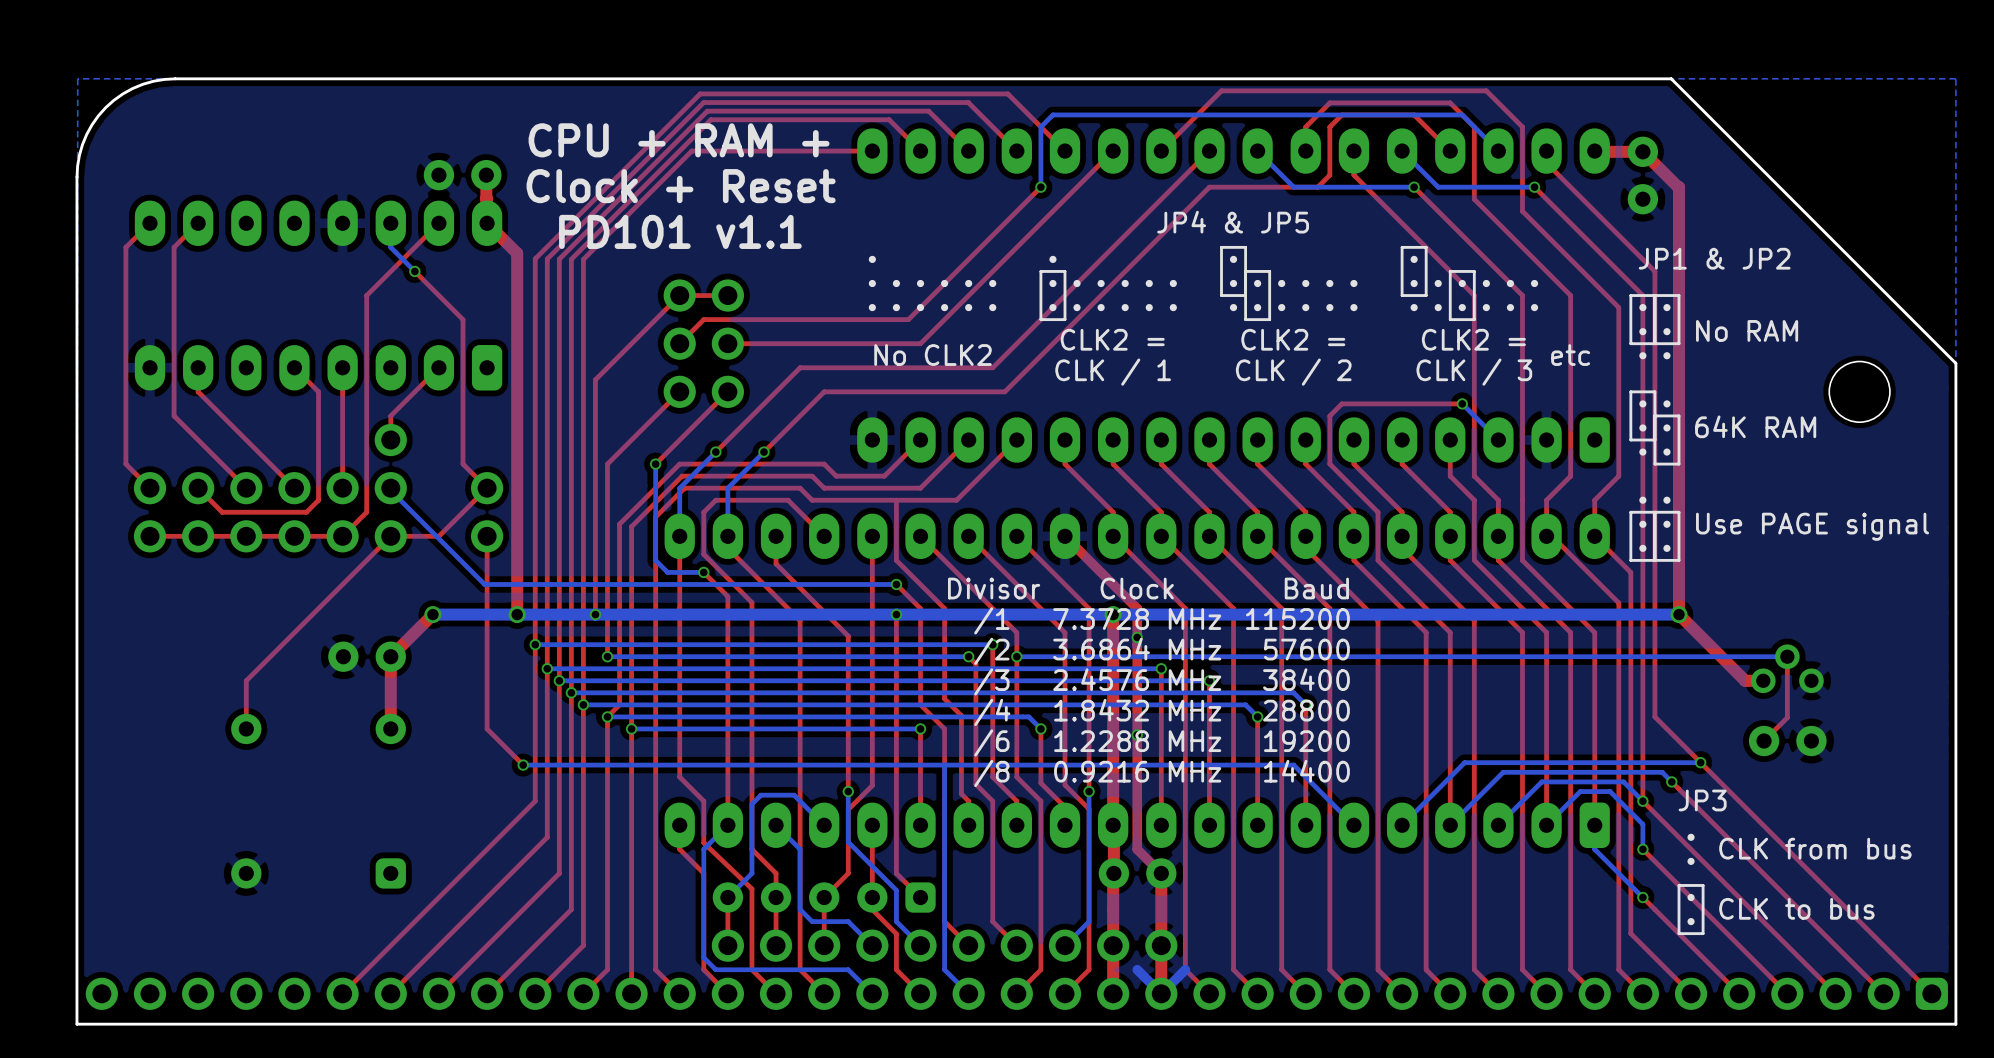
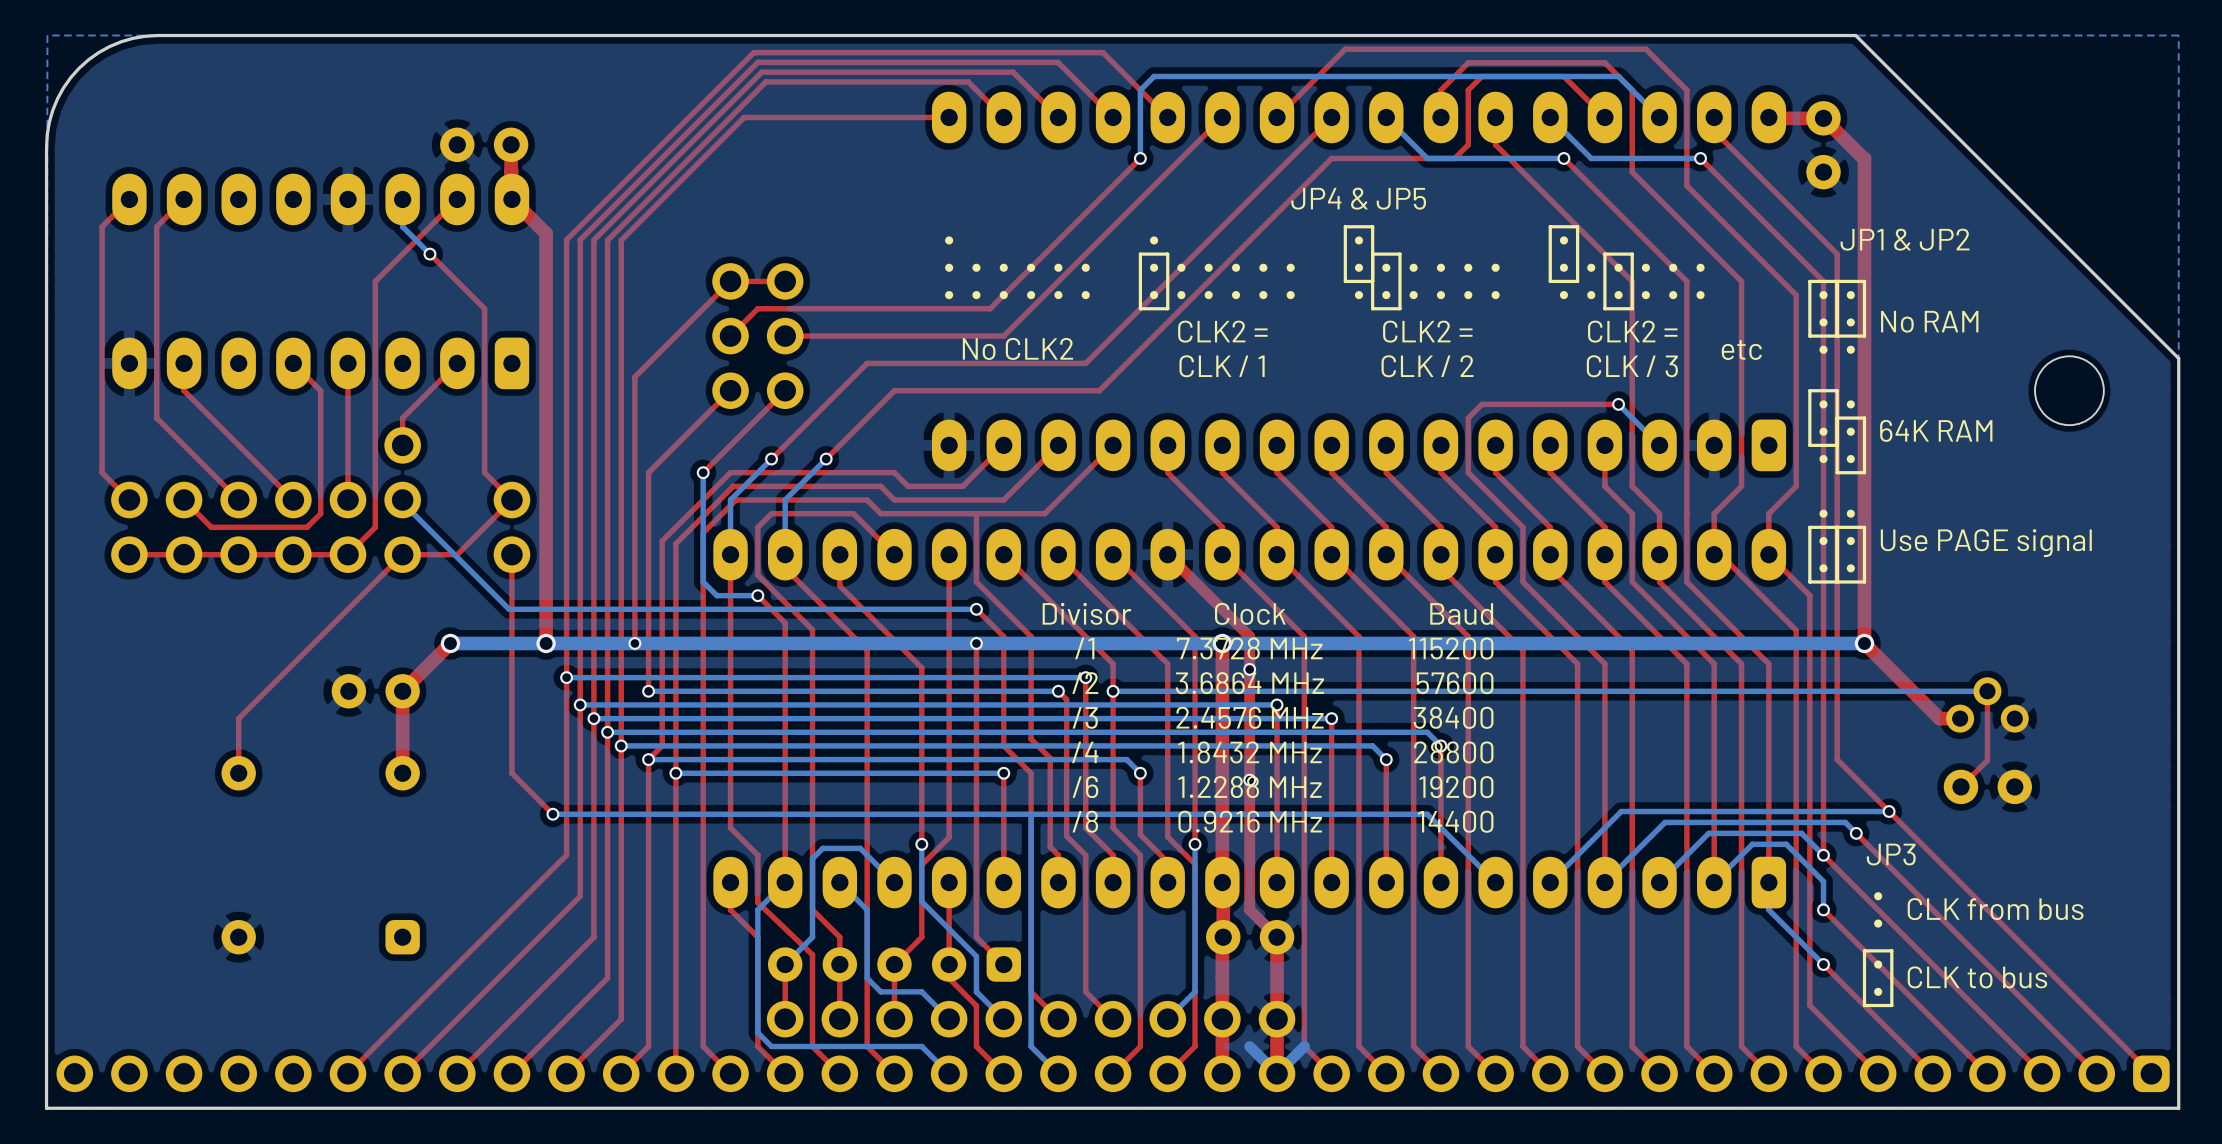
text: CPU + RAM + (679, 140) -> none
text: Clock + Reset (681, 186) -> none
text: PD101 v1.1 (680, 231) -> none

